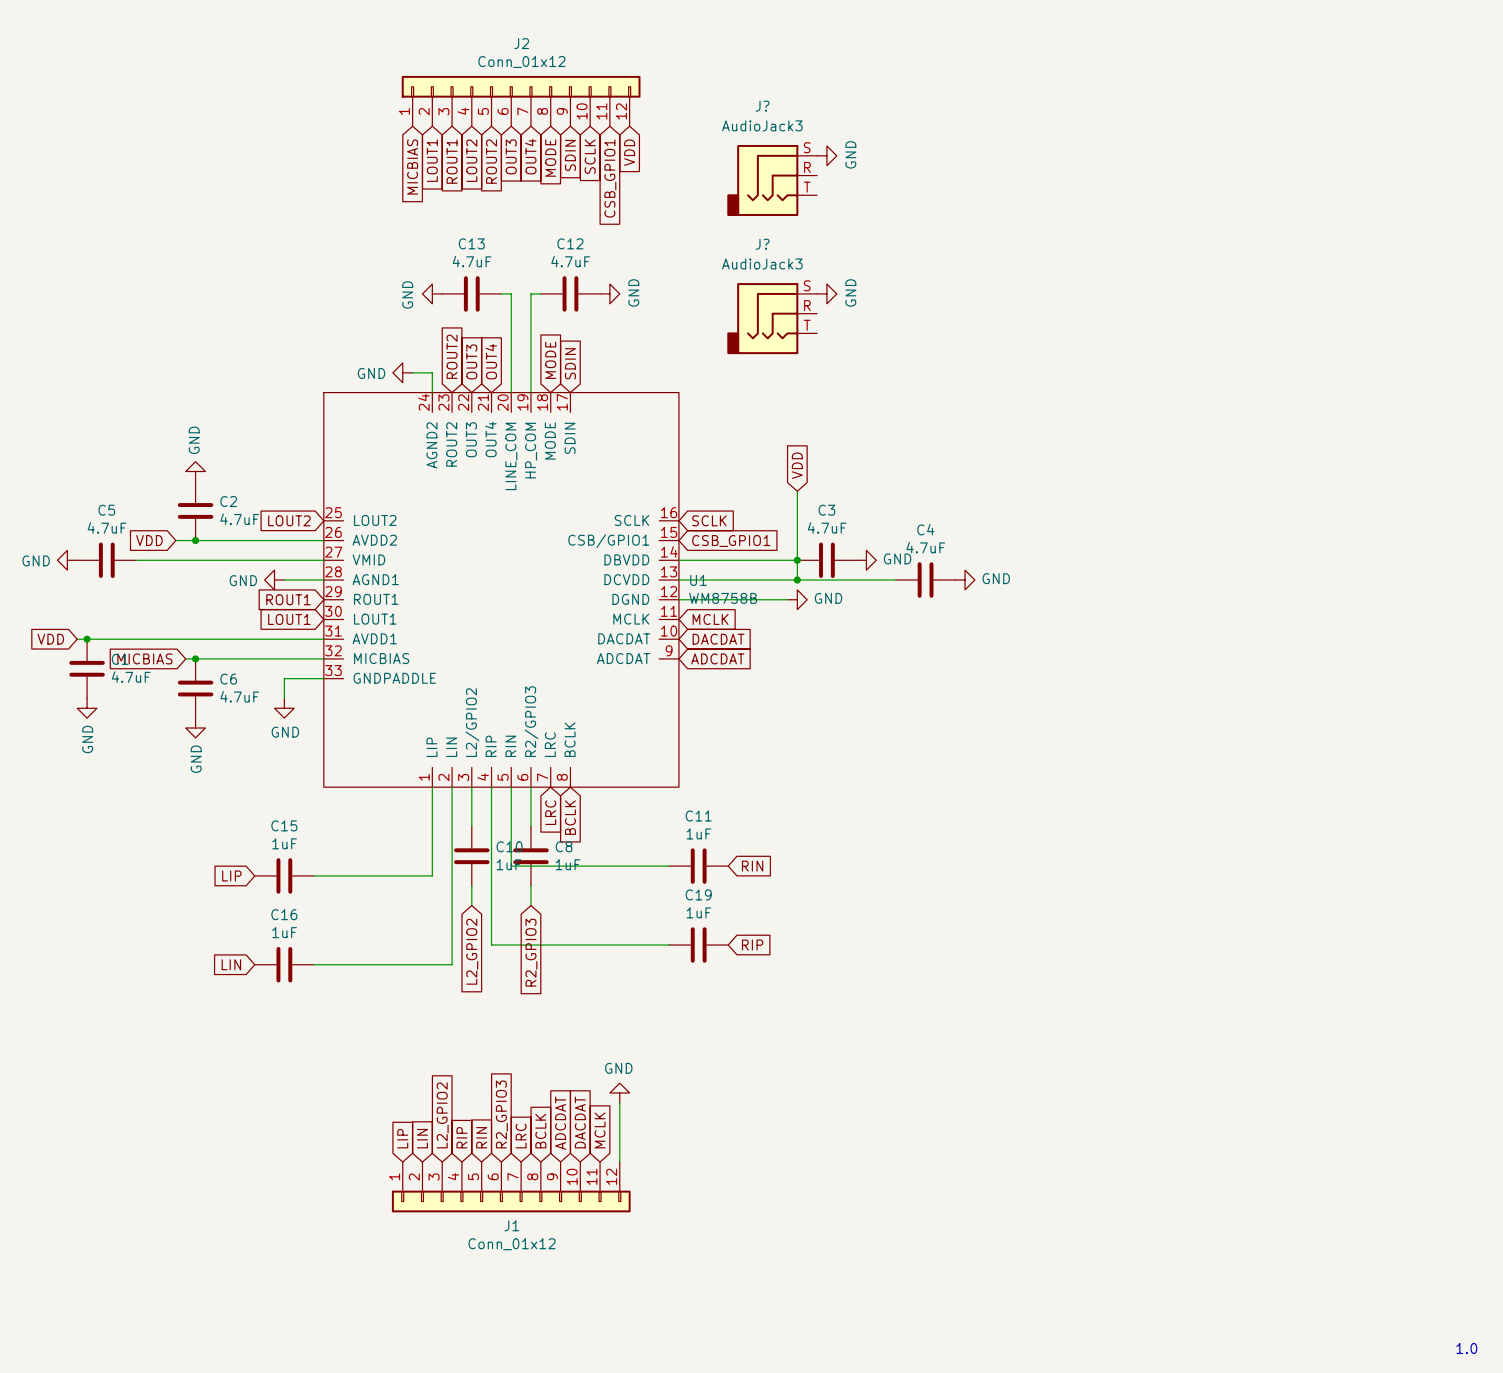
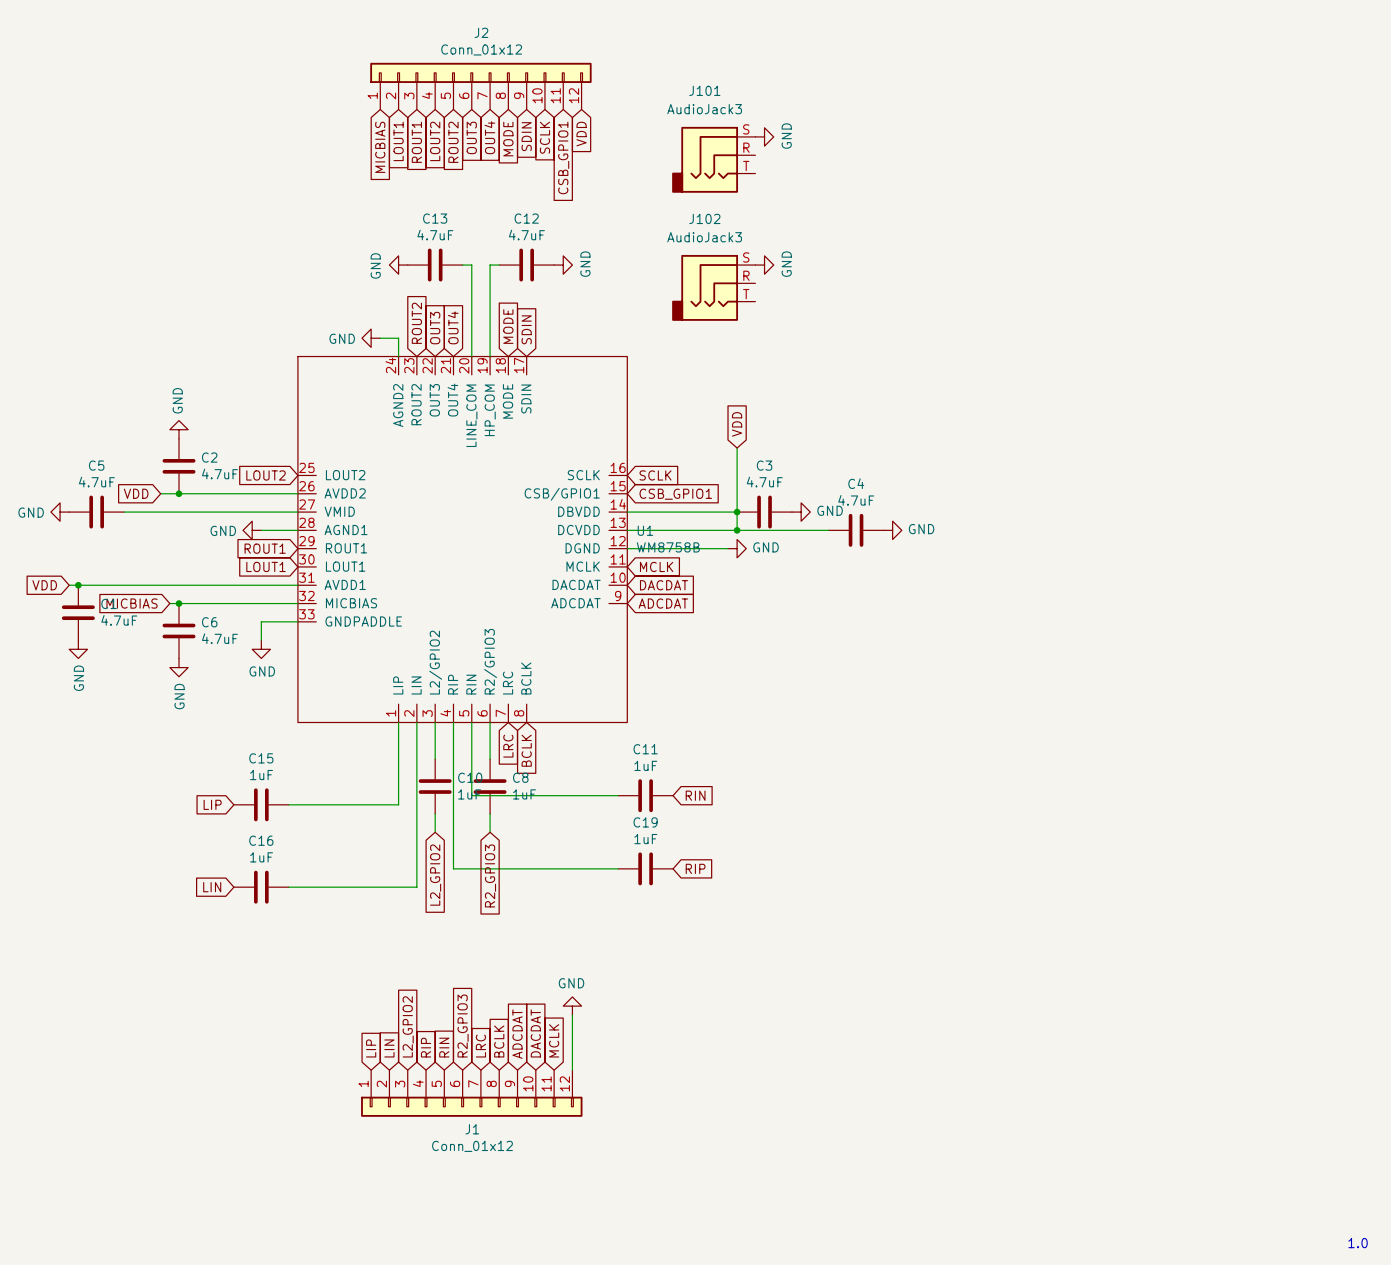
J? name: J? (762, 106) -> J101 (704, 90)
J? name: J? (762, 244) -> J102 (704, 218)

